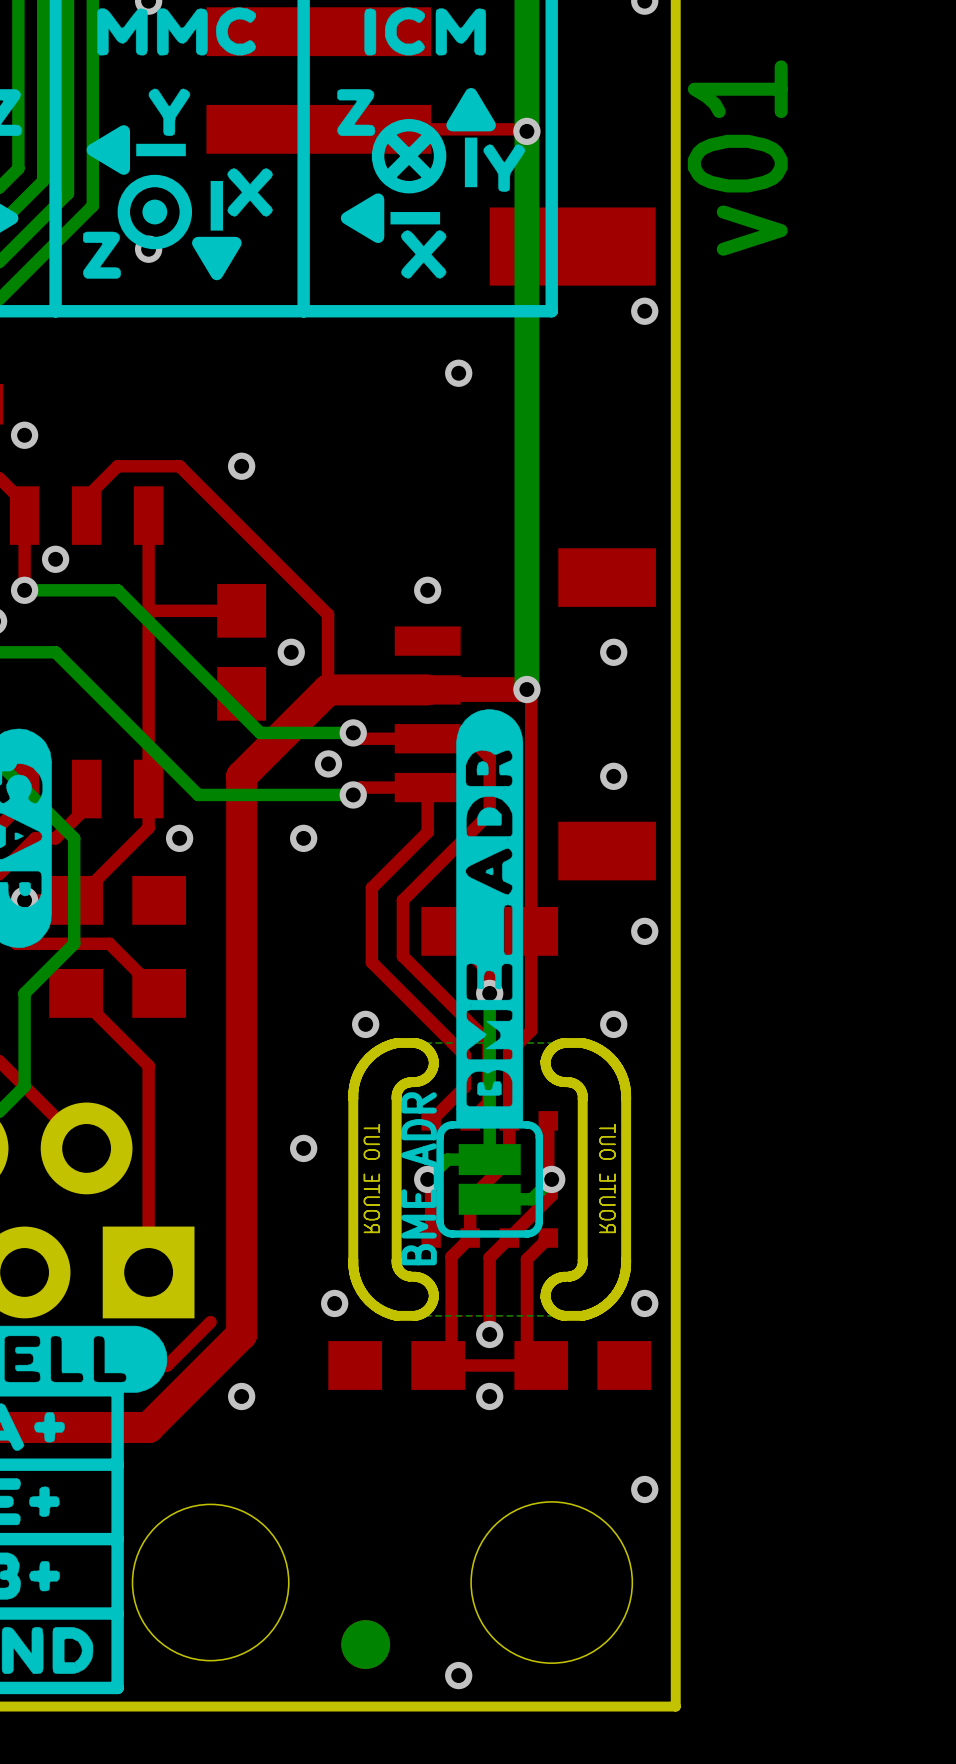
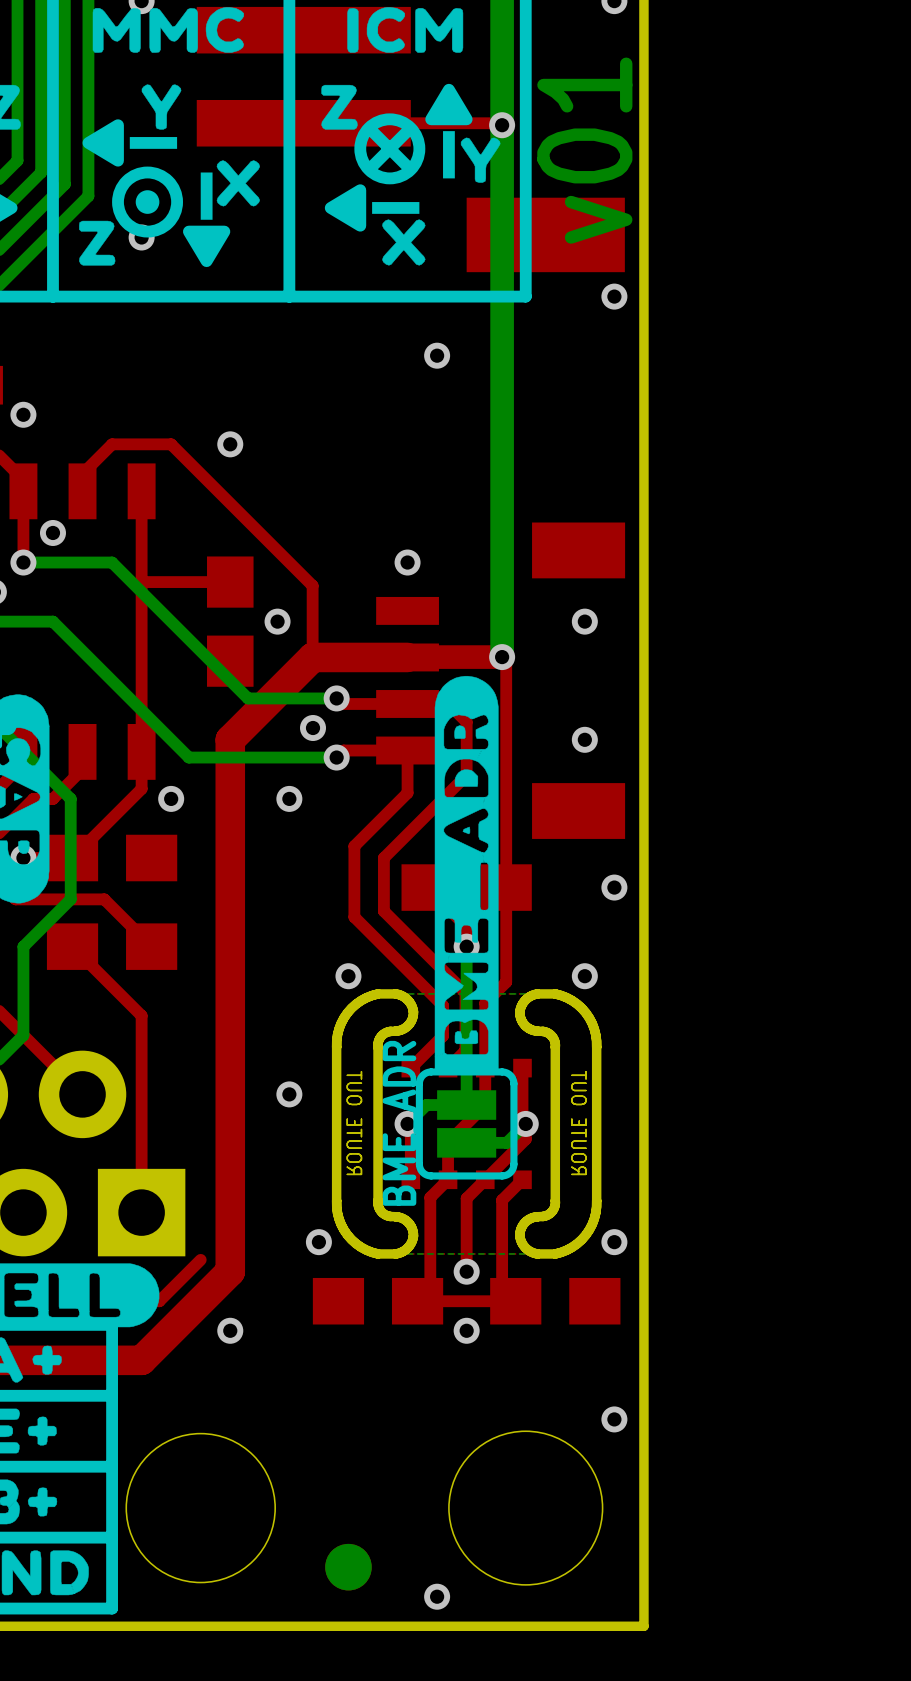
text position: v01 (737, 158) -> v01 (584, 150)

